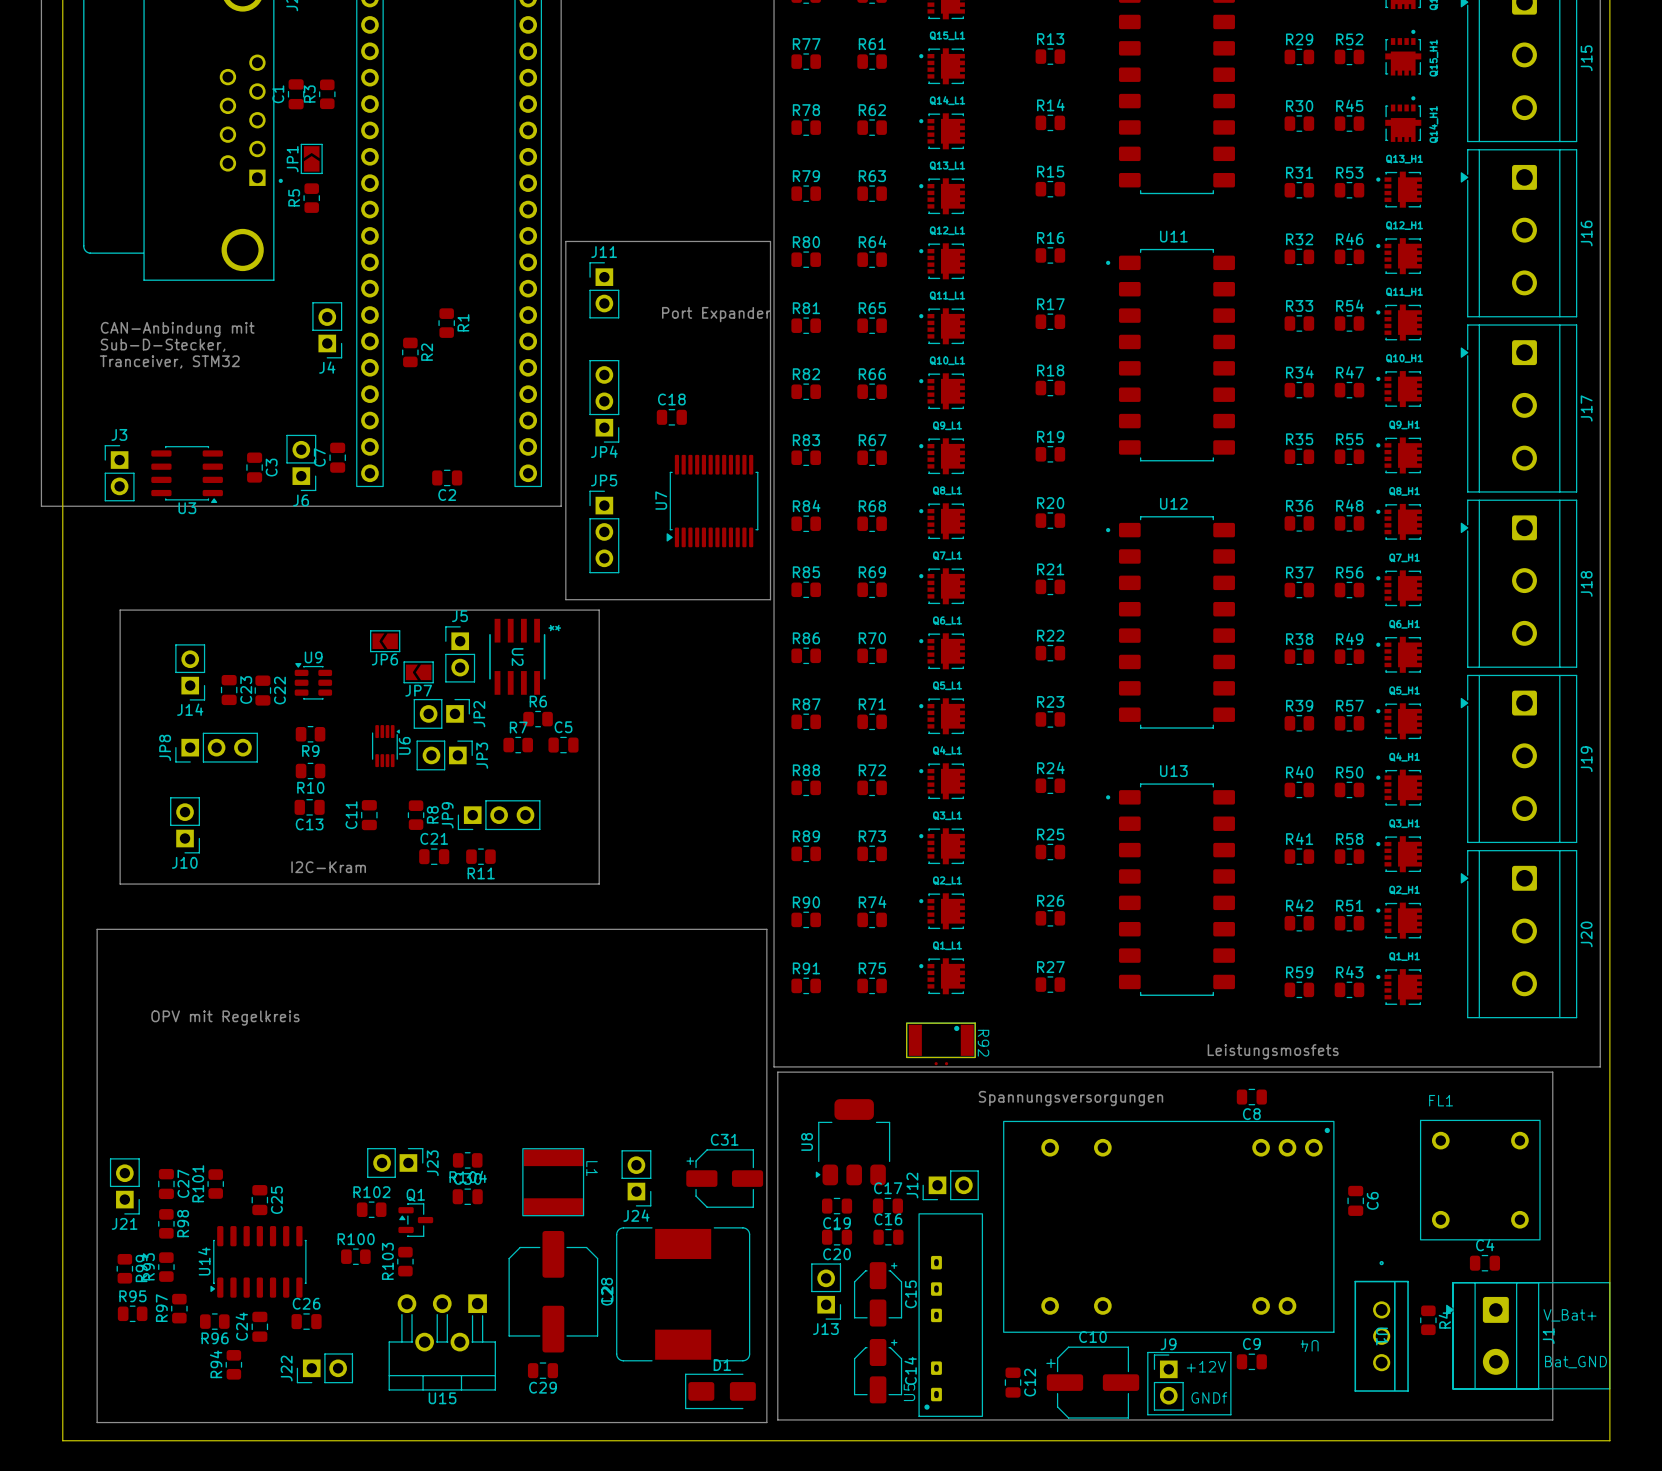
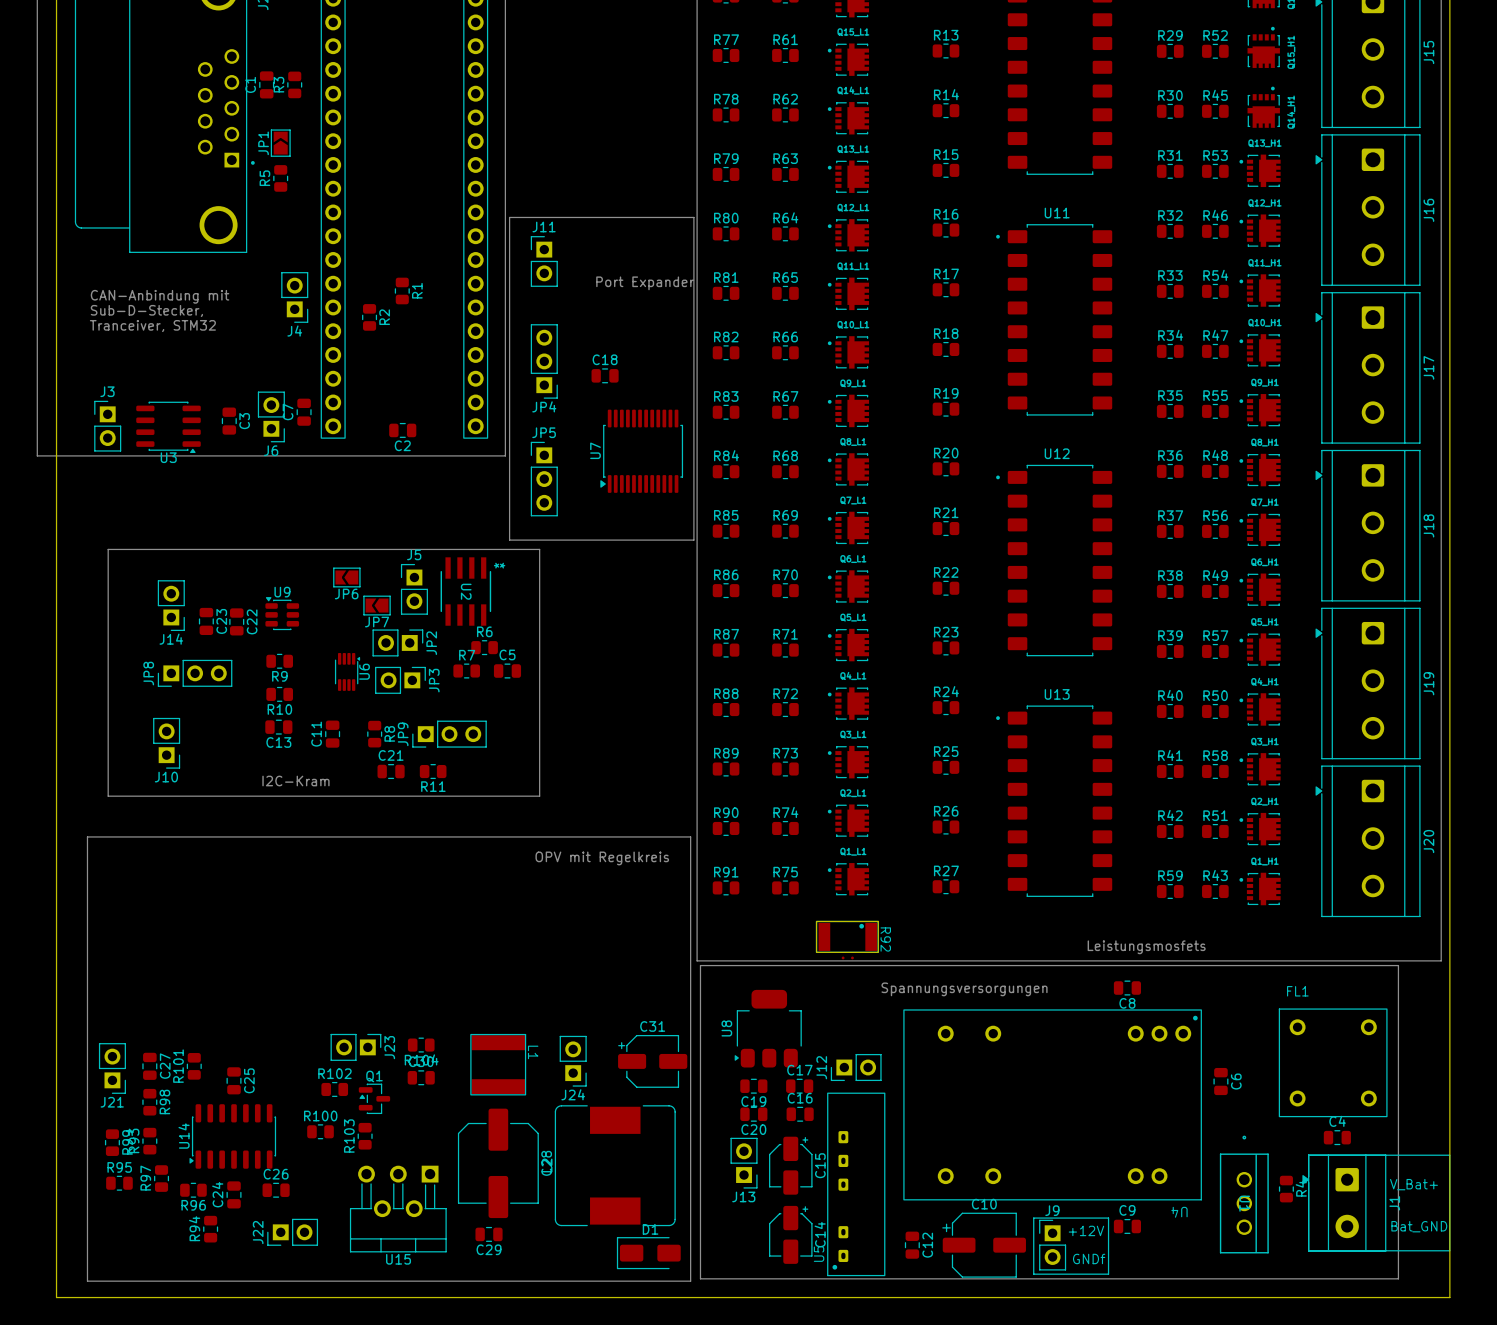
text: none -> OPV mit Regelkreis (602, 858)
text: OPV mit Regelkreis (225, 1018) -> none

